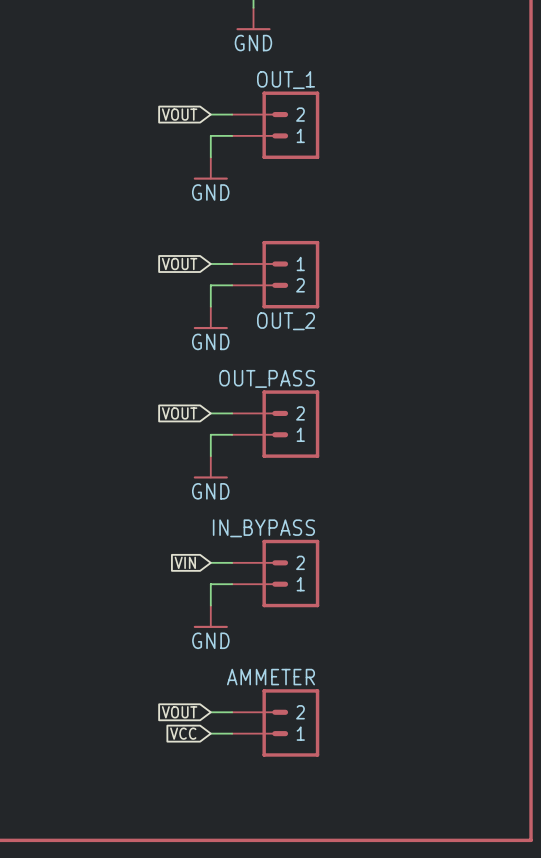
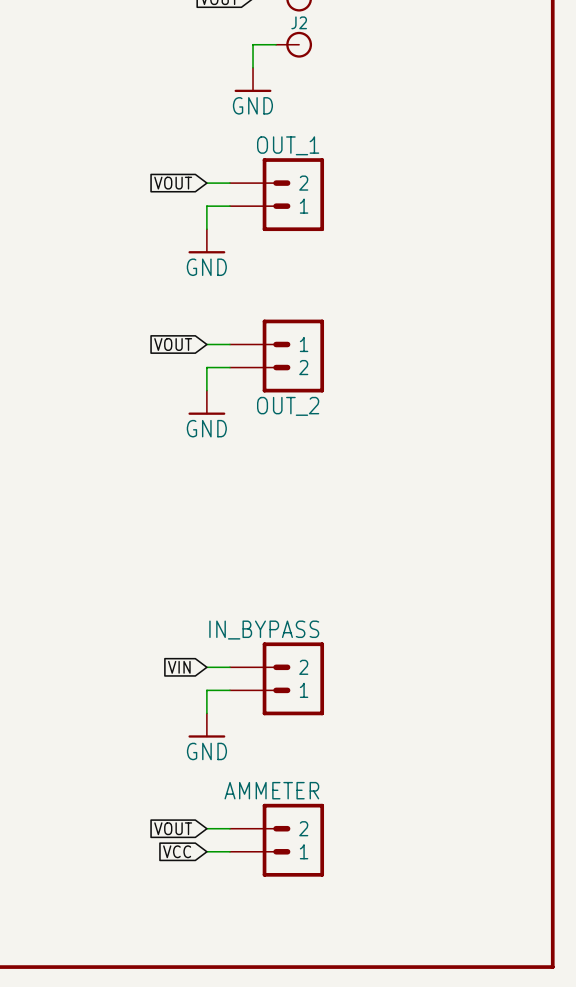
global label: VOUT (179, 413) -> none
wire: (210, 413) (232, 413) -> none
OUT_PASS: (275, 424) -> none
wire: (232, 434) (210, 434) (210, 456) -> none
power symbol: GND (210, 467) -> none

